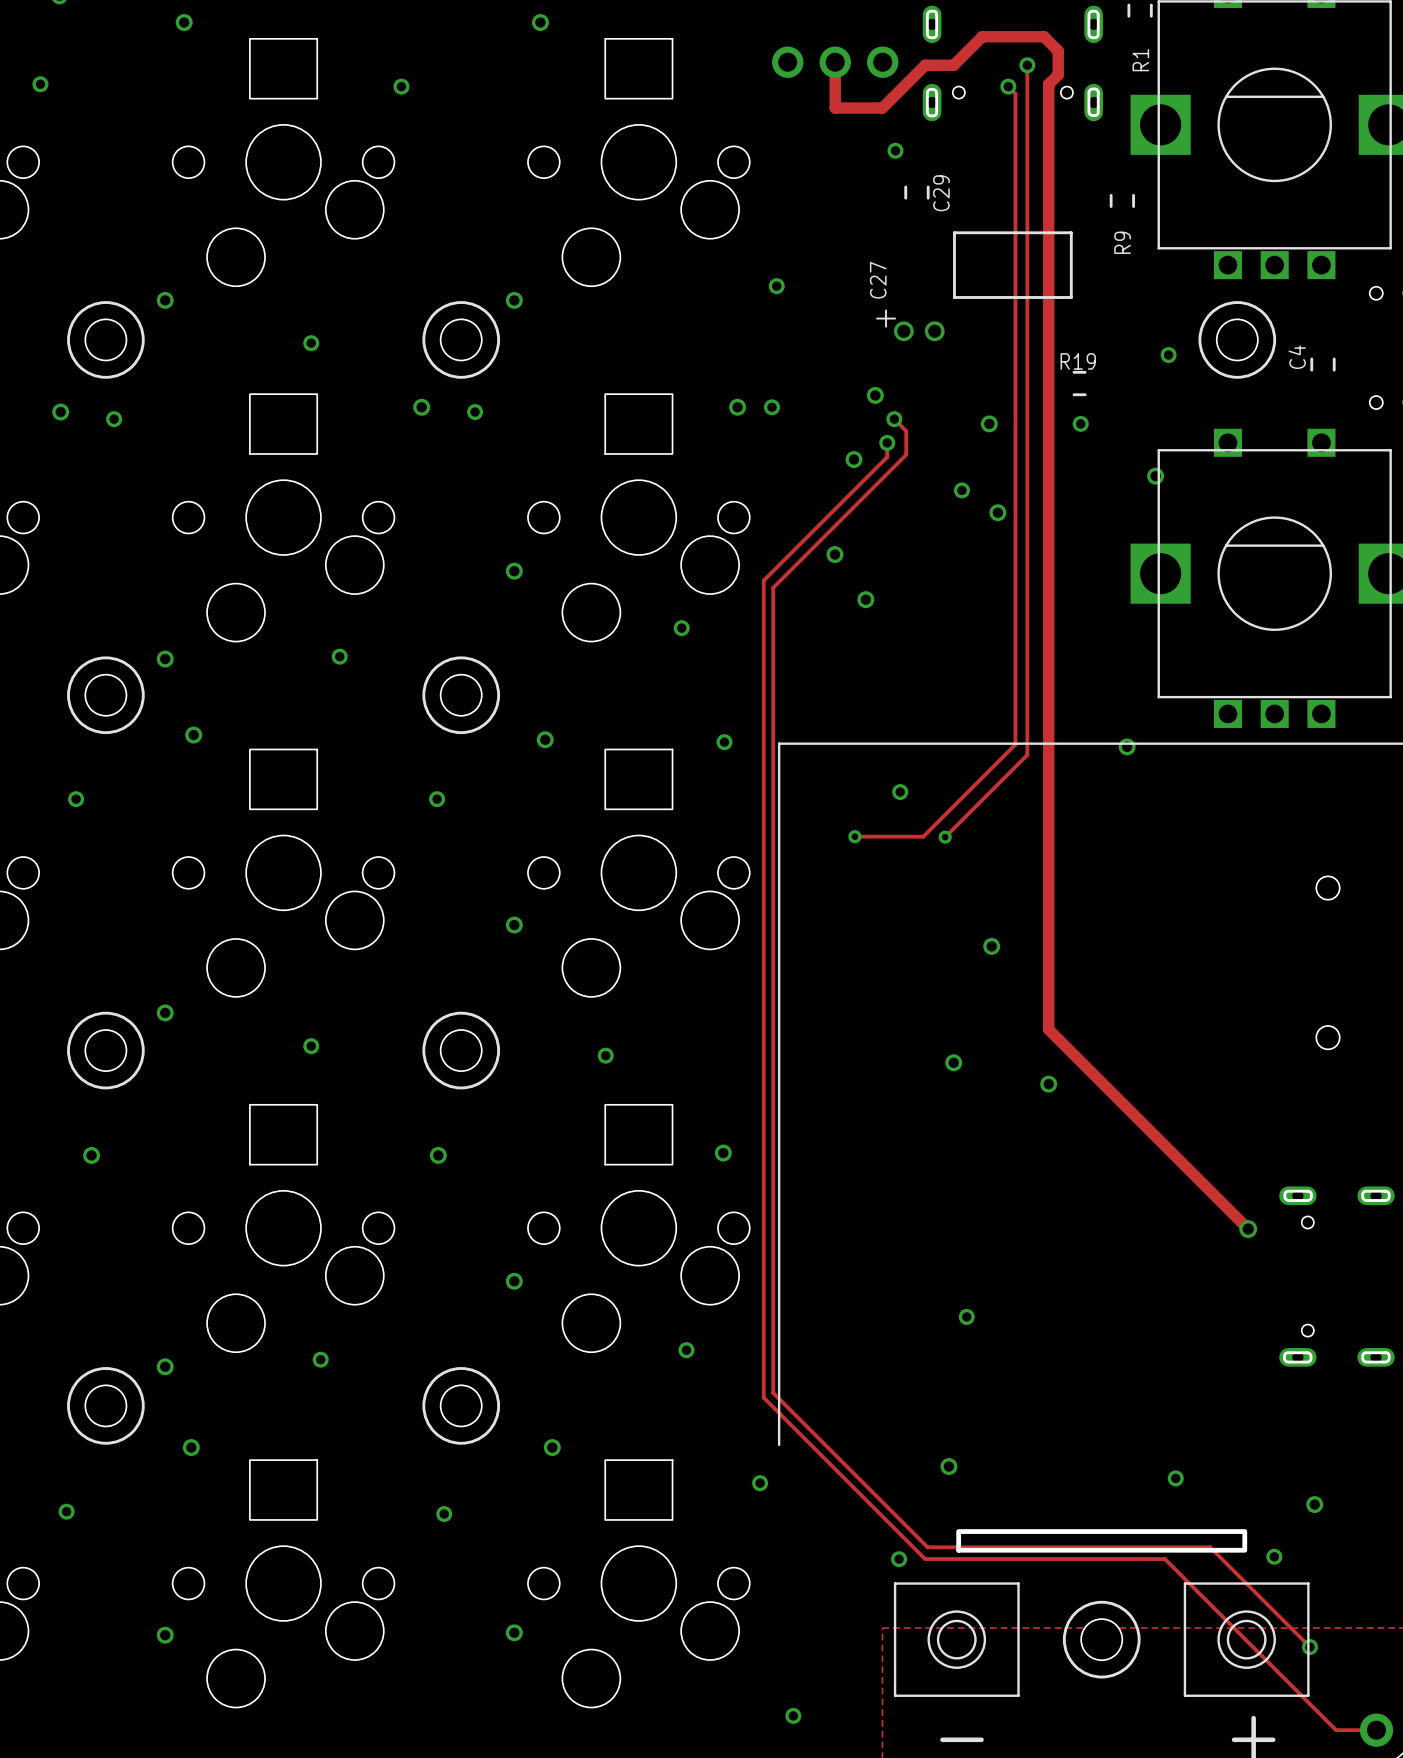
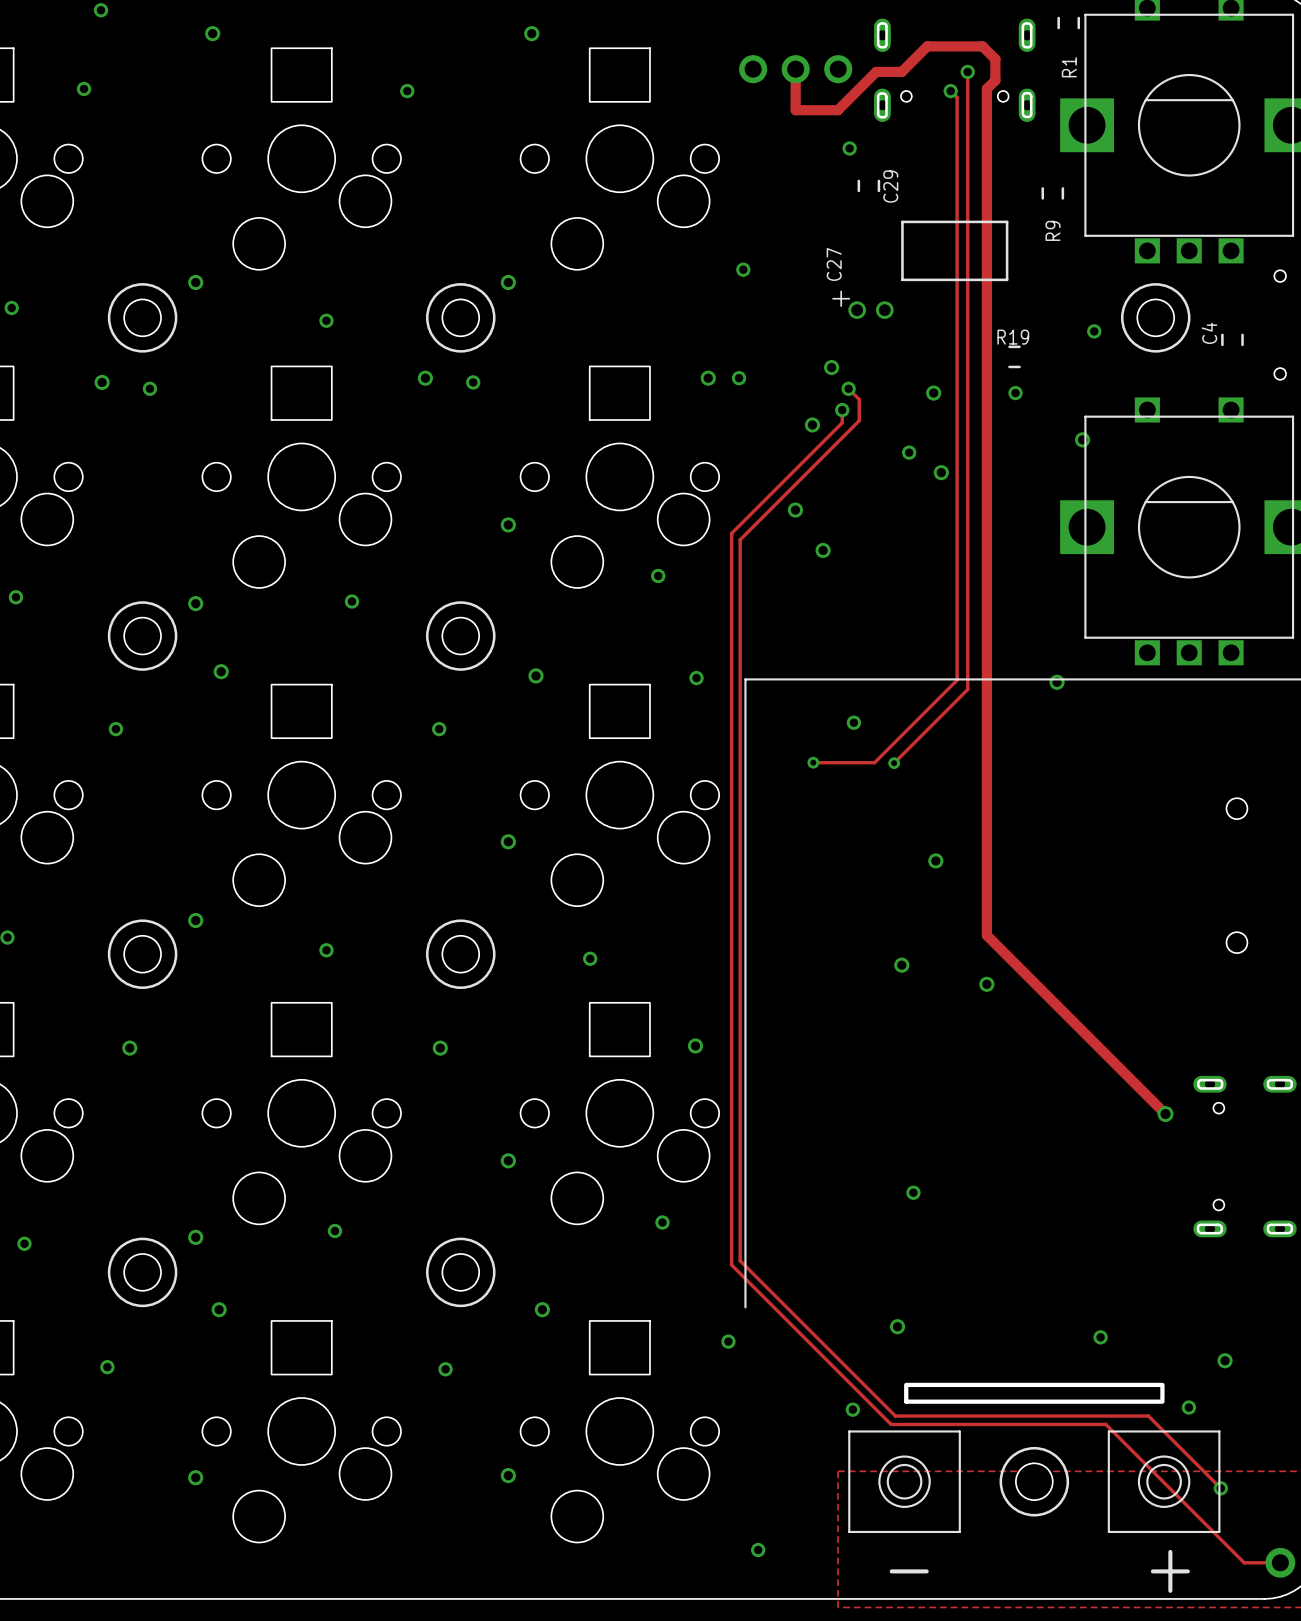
track: (927, 1547) (1210, 1547) (1229, 1566) -> (878, 1399) (895, 1416) (1148, 1416)
track: (925, 1559) (1164, 1559) (1181, 1575) -> (876, 1409) (891, 1424) (1105, 1424)

